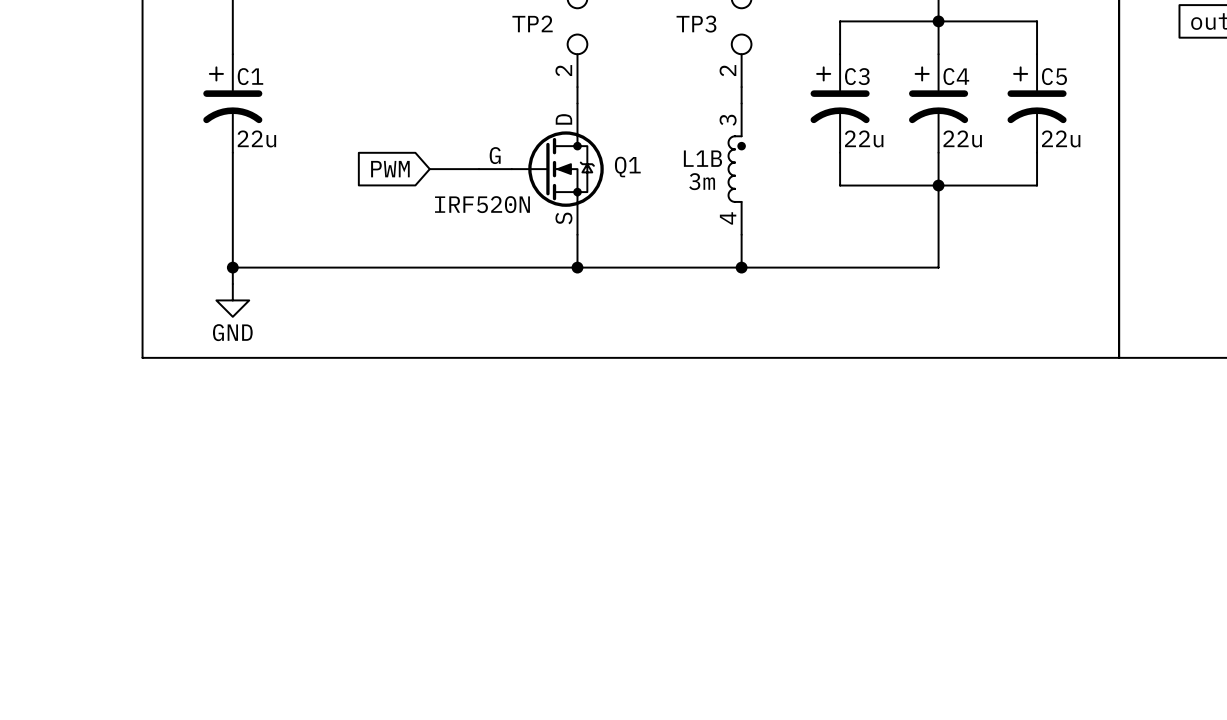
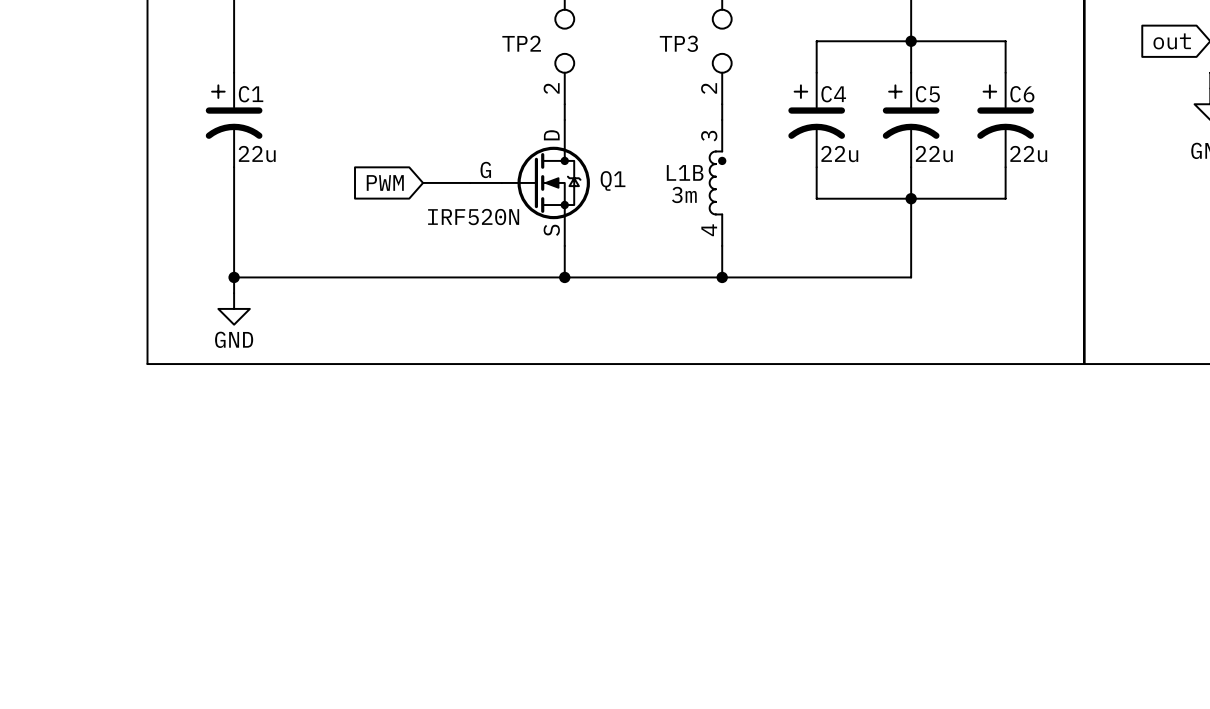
C3 name: C3 (857, 76) -> C4 (833, 94)
C4 name: C4 (956, 76) -> C5 (927, 94)
C5 name: C5 (1054, 76) -> C6 (1022, 94)

